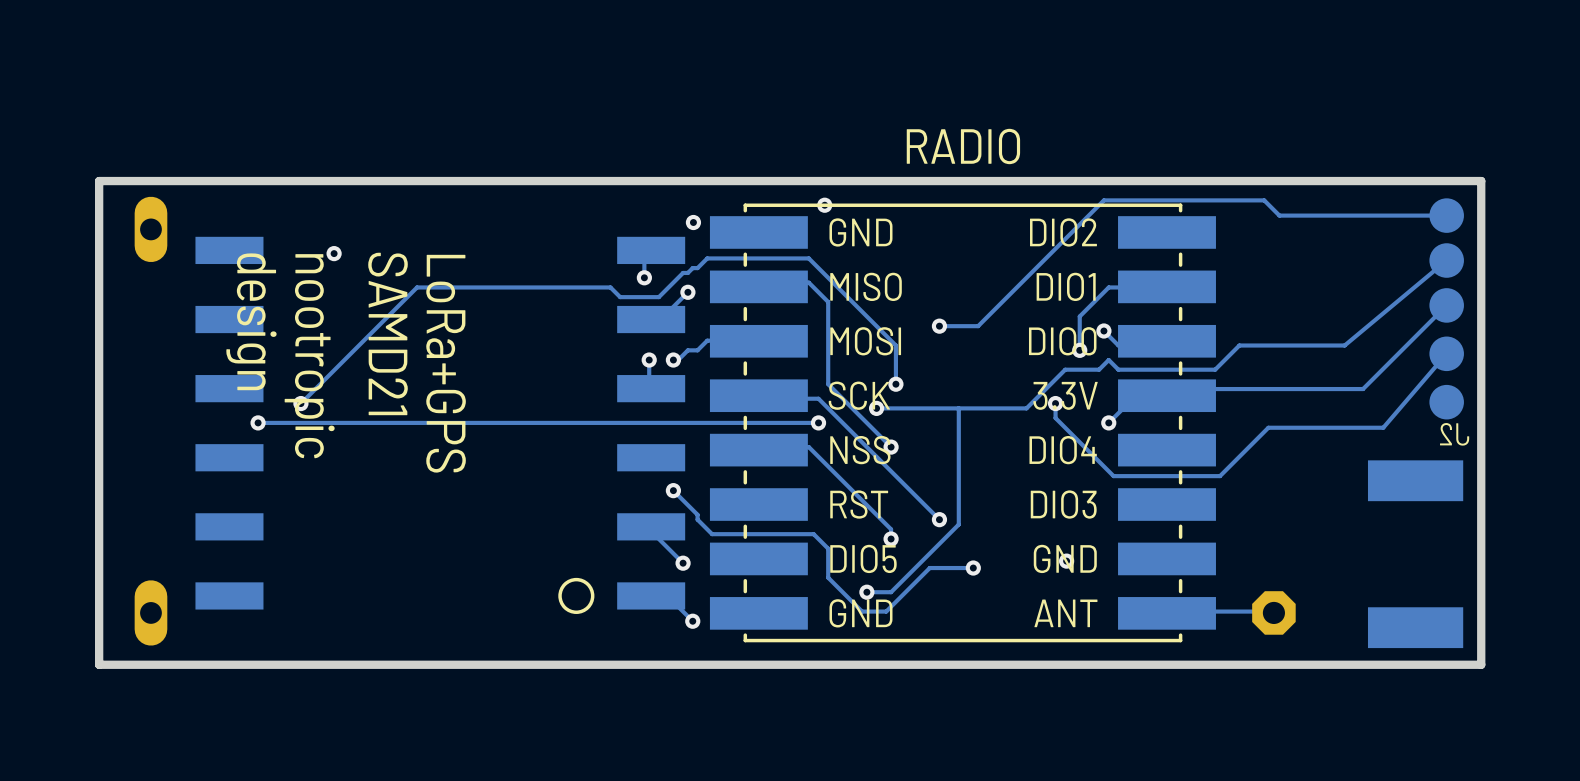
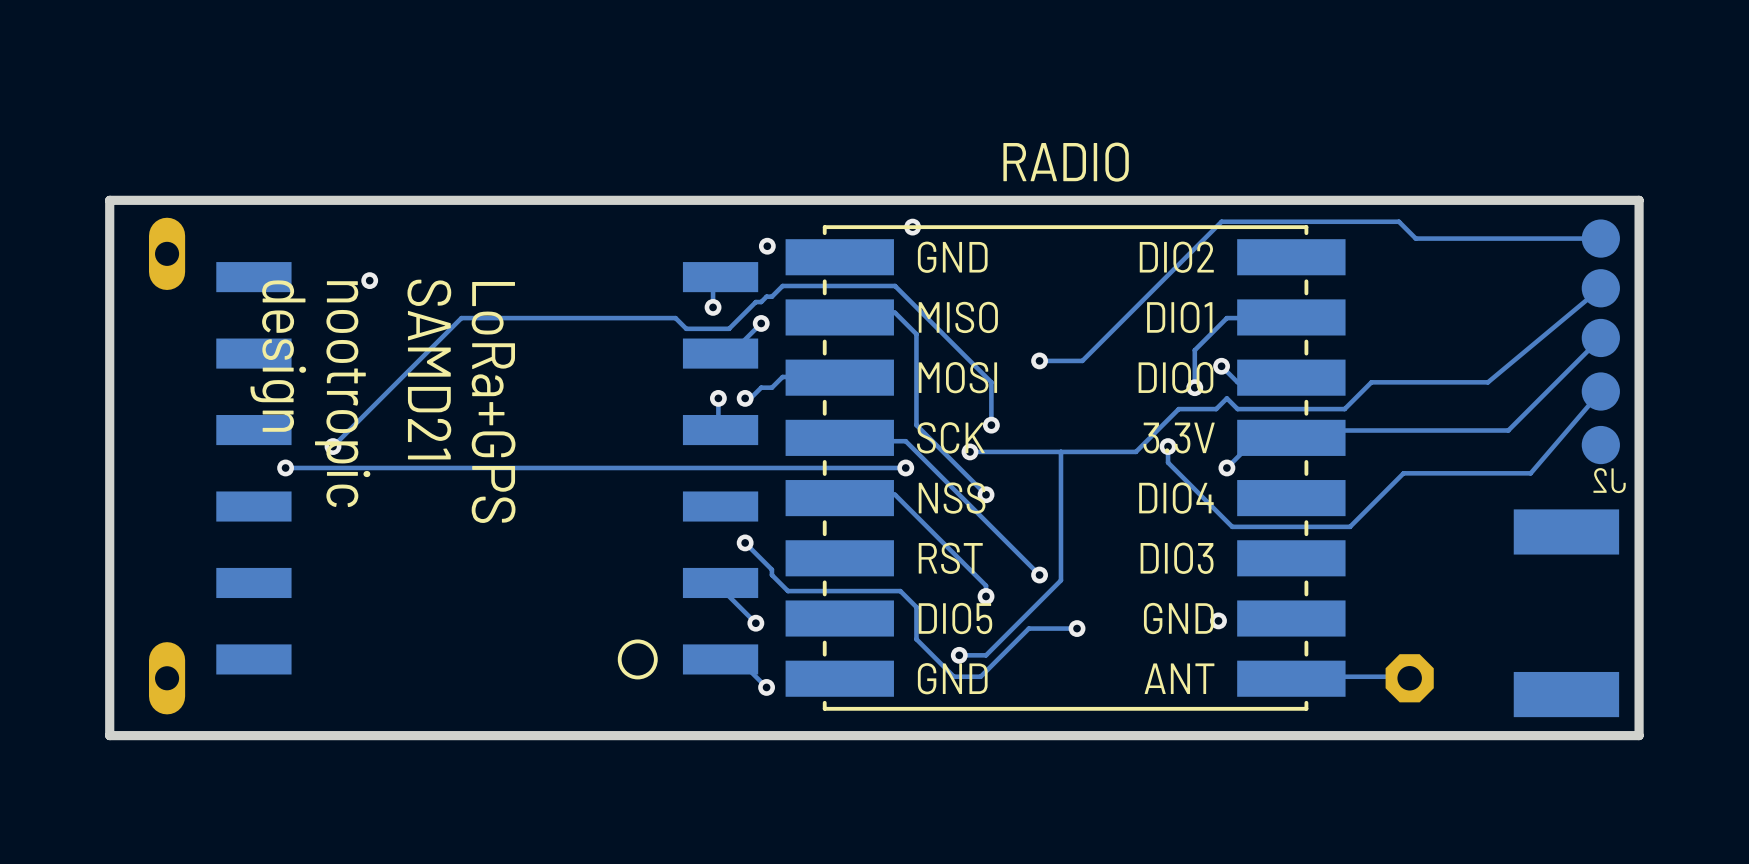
via position: (1066, 561) -> (1218, 620)

